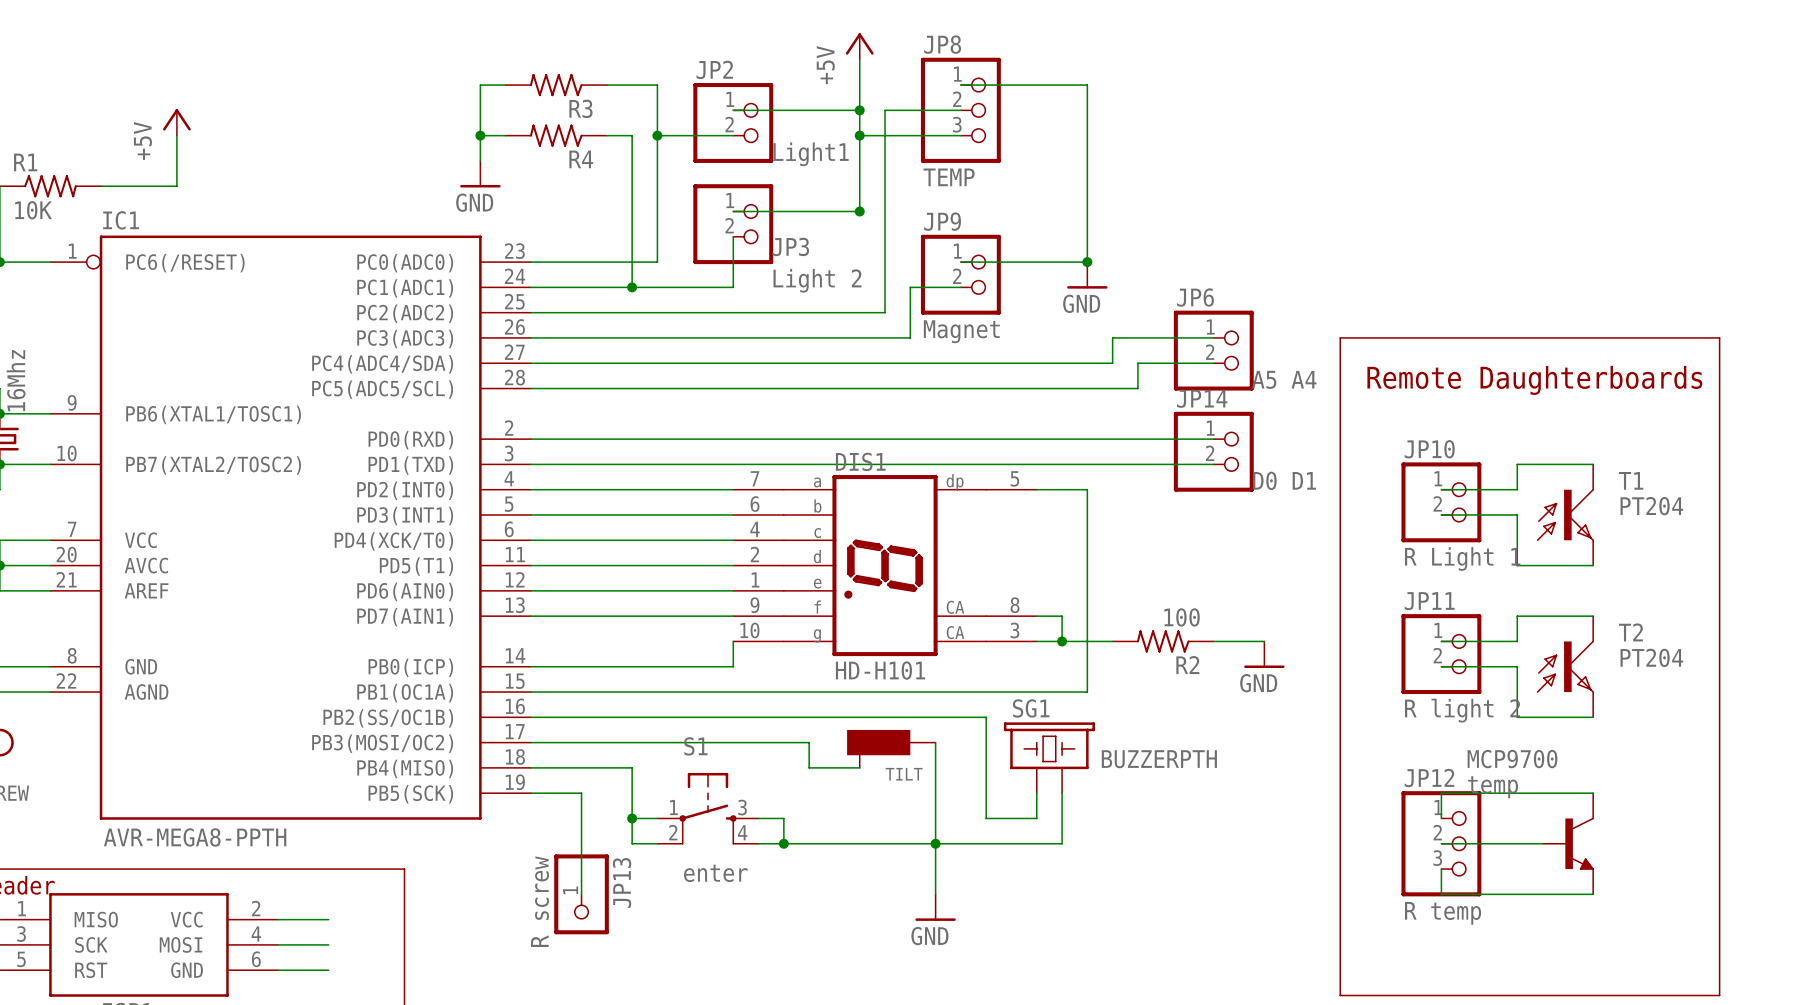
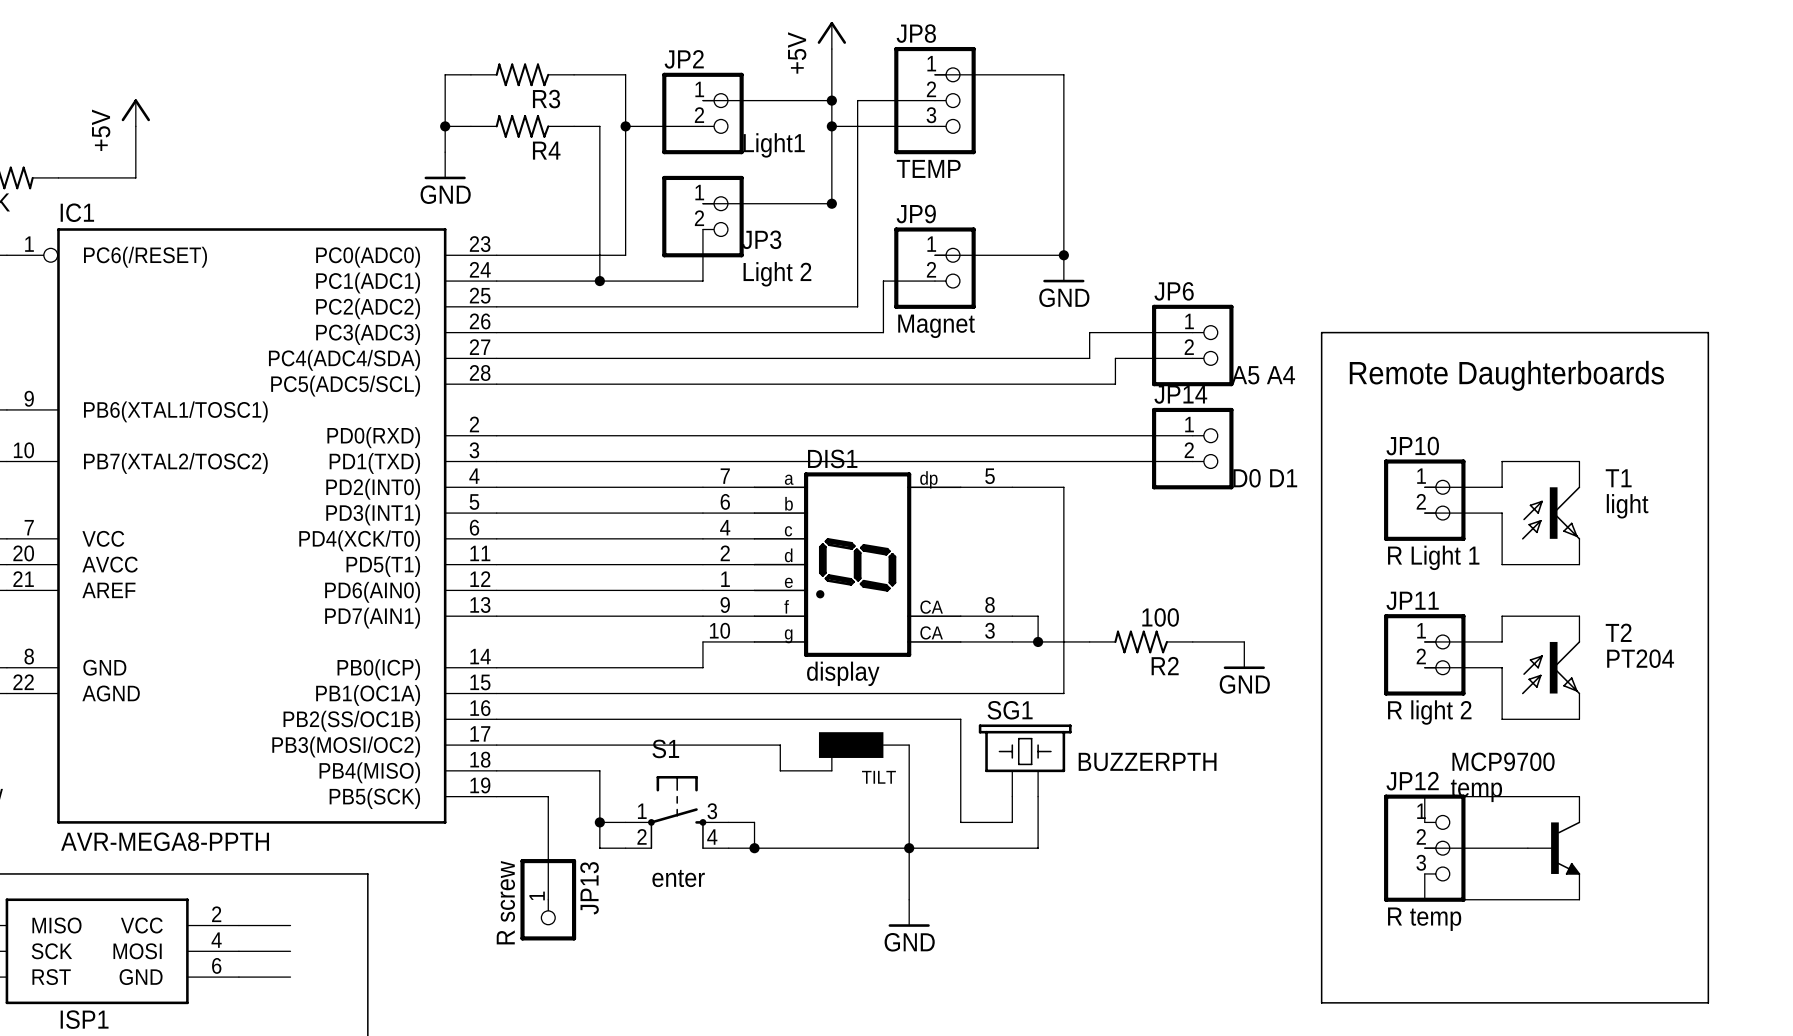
T1 value: PT204 (1651, 506) -> light (1627, 506)
DIS1 value: HD-H101 (880, 670) -> display (843, 673)

